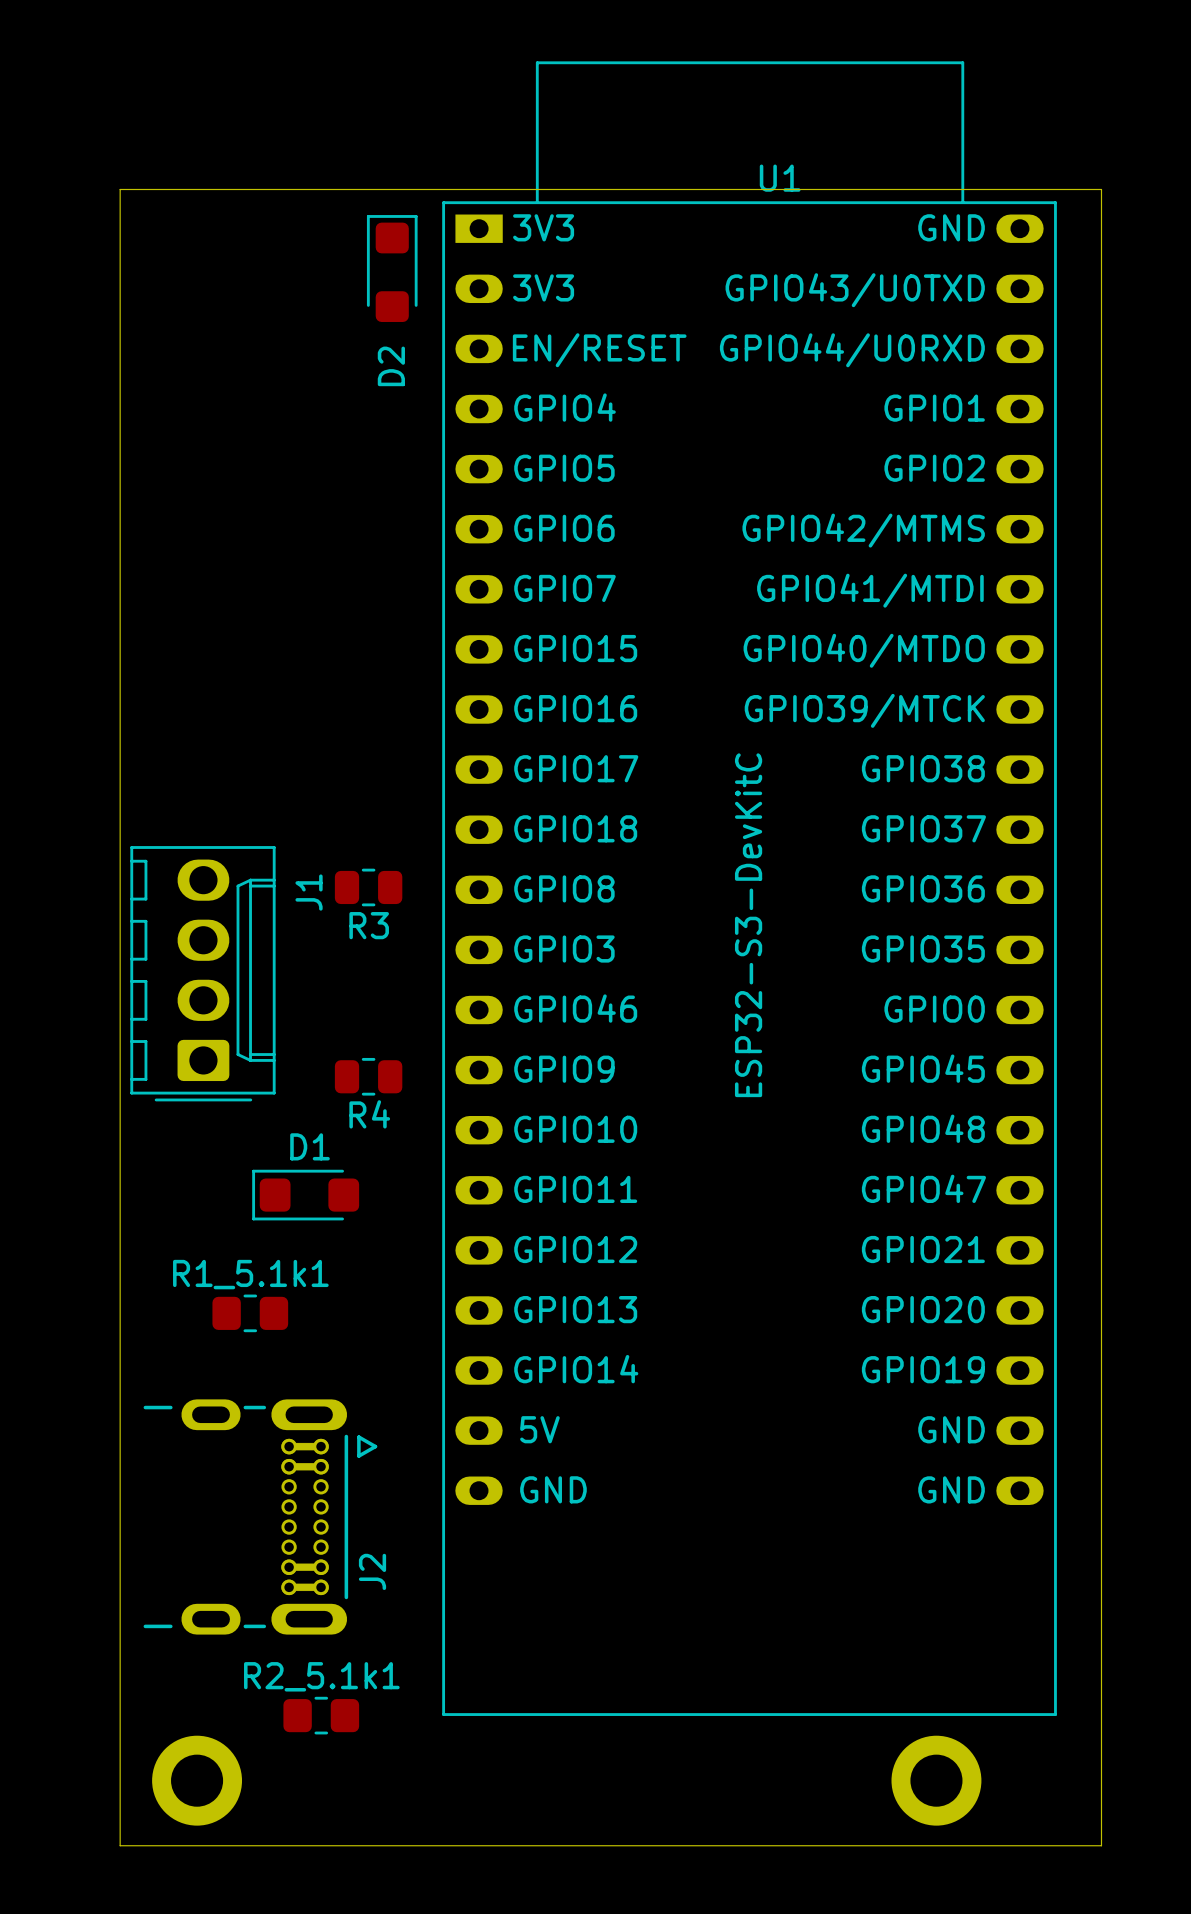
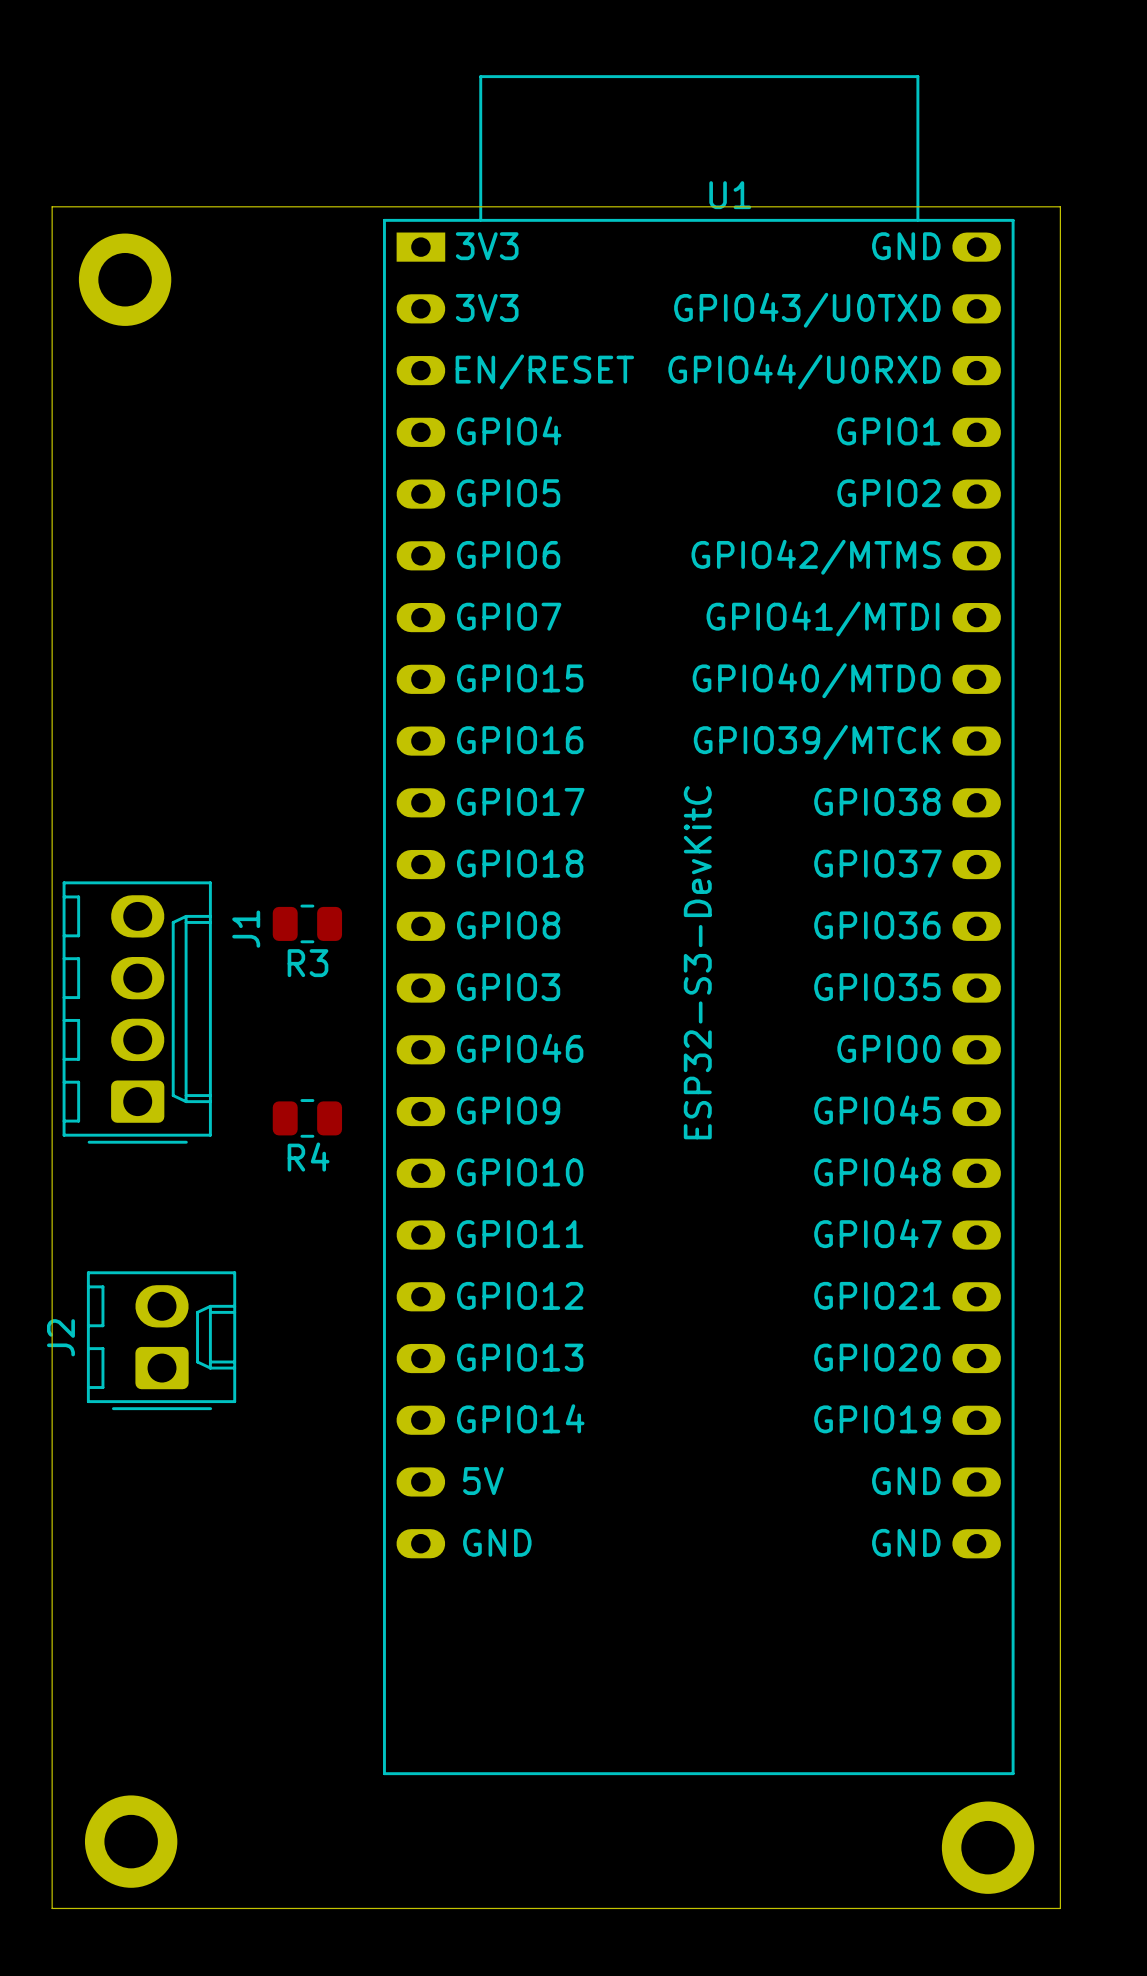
part: none -> (125, 279)
D2: (392, 268) -> none
D1: (305, 1195) -> none
R1_5.1k1: (250, 1313) -> none
J2 footprint: [143, 1399, 378, 1635] -> [86, 1271, 237, 1411]
J2 name position: J2 (372, 1571) -> J2 (60, 1337)
R2_5.1k1: (321, 1715) -> none
part position: (936, 1780) -> (988, 1847)

